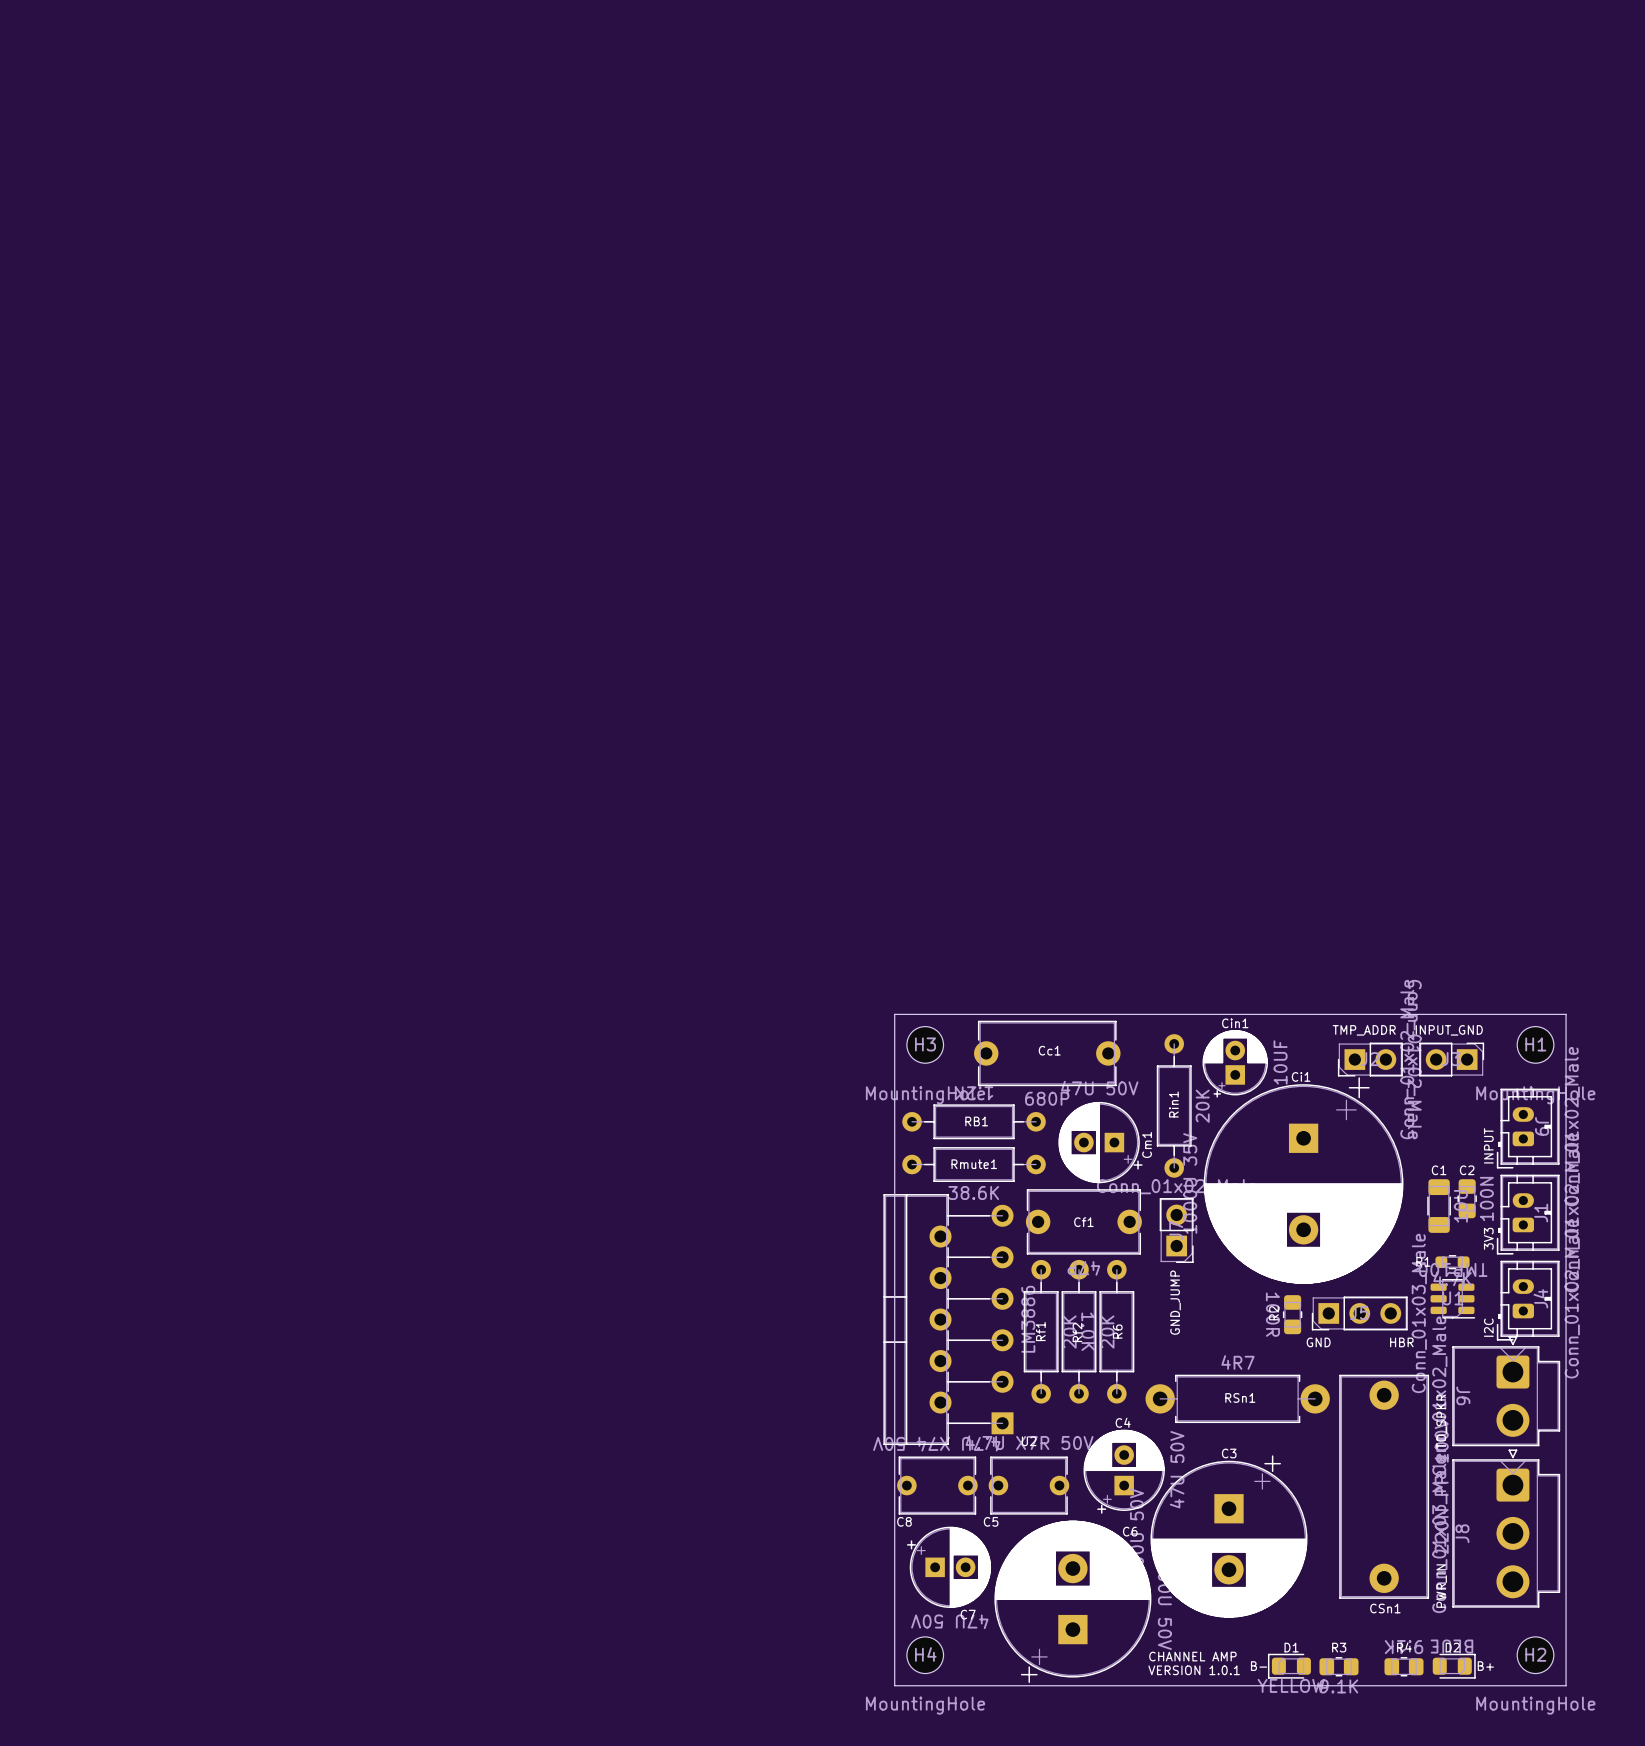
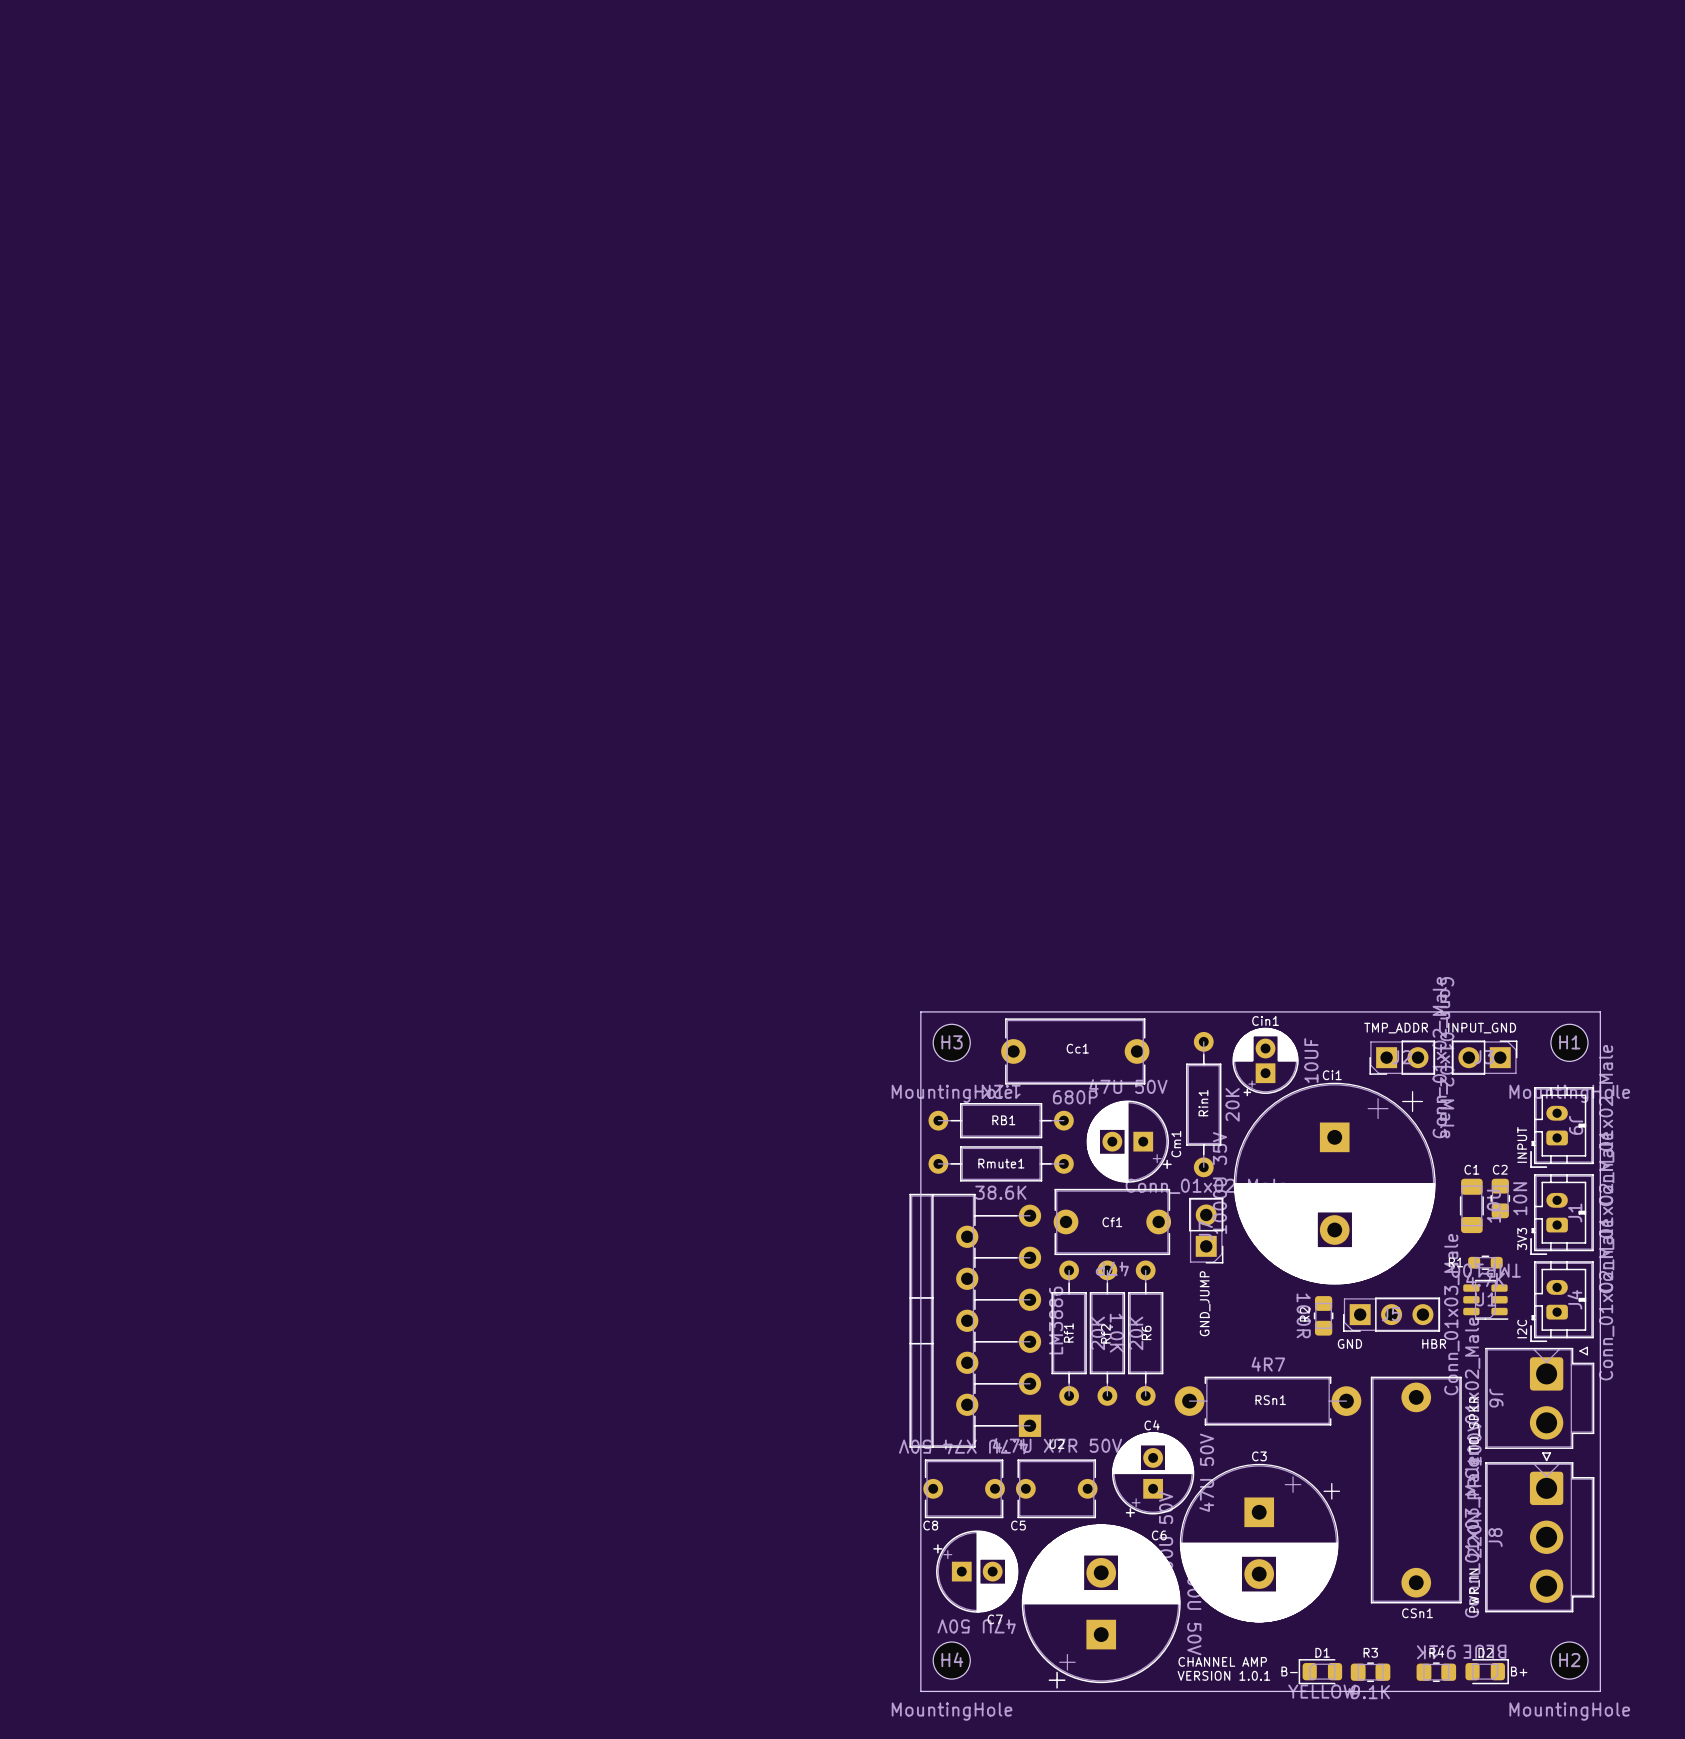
Ci1 footprint: [1203, 1077, 1404, 1284] -> [1233, 1082, 1436, 1285]
C2 value: 100N (1486, 1198) -> 10N (1520, 1198)
J6 footprint: [1452, 1336, 1561, 1447] -> [1485, 1346, 1595, 1449]
C3 footprint: [1150, 1455, 1308, 1618] -> [1179, 1463, 1341, 1623]

